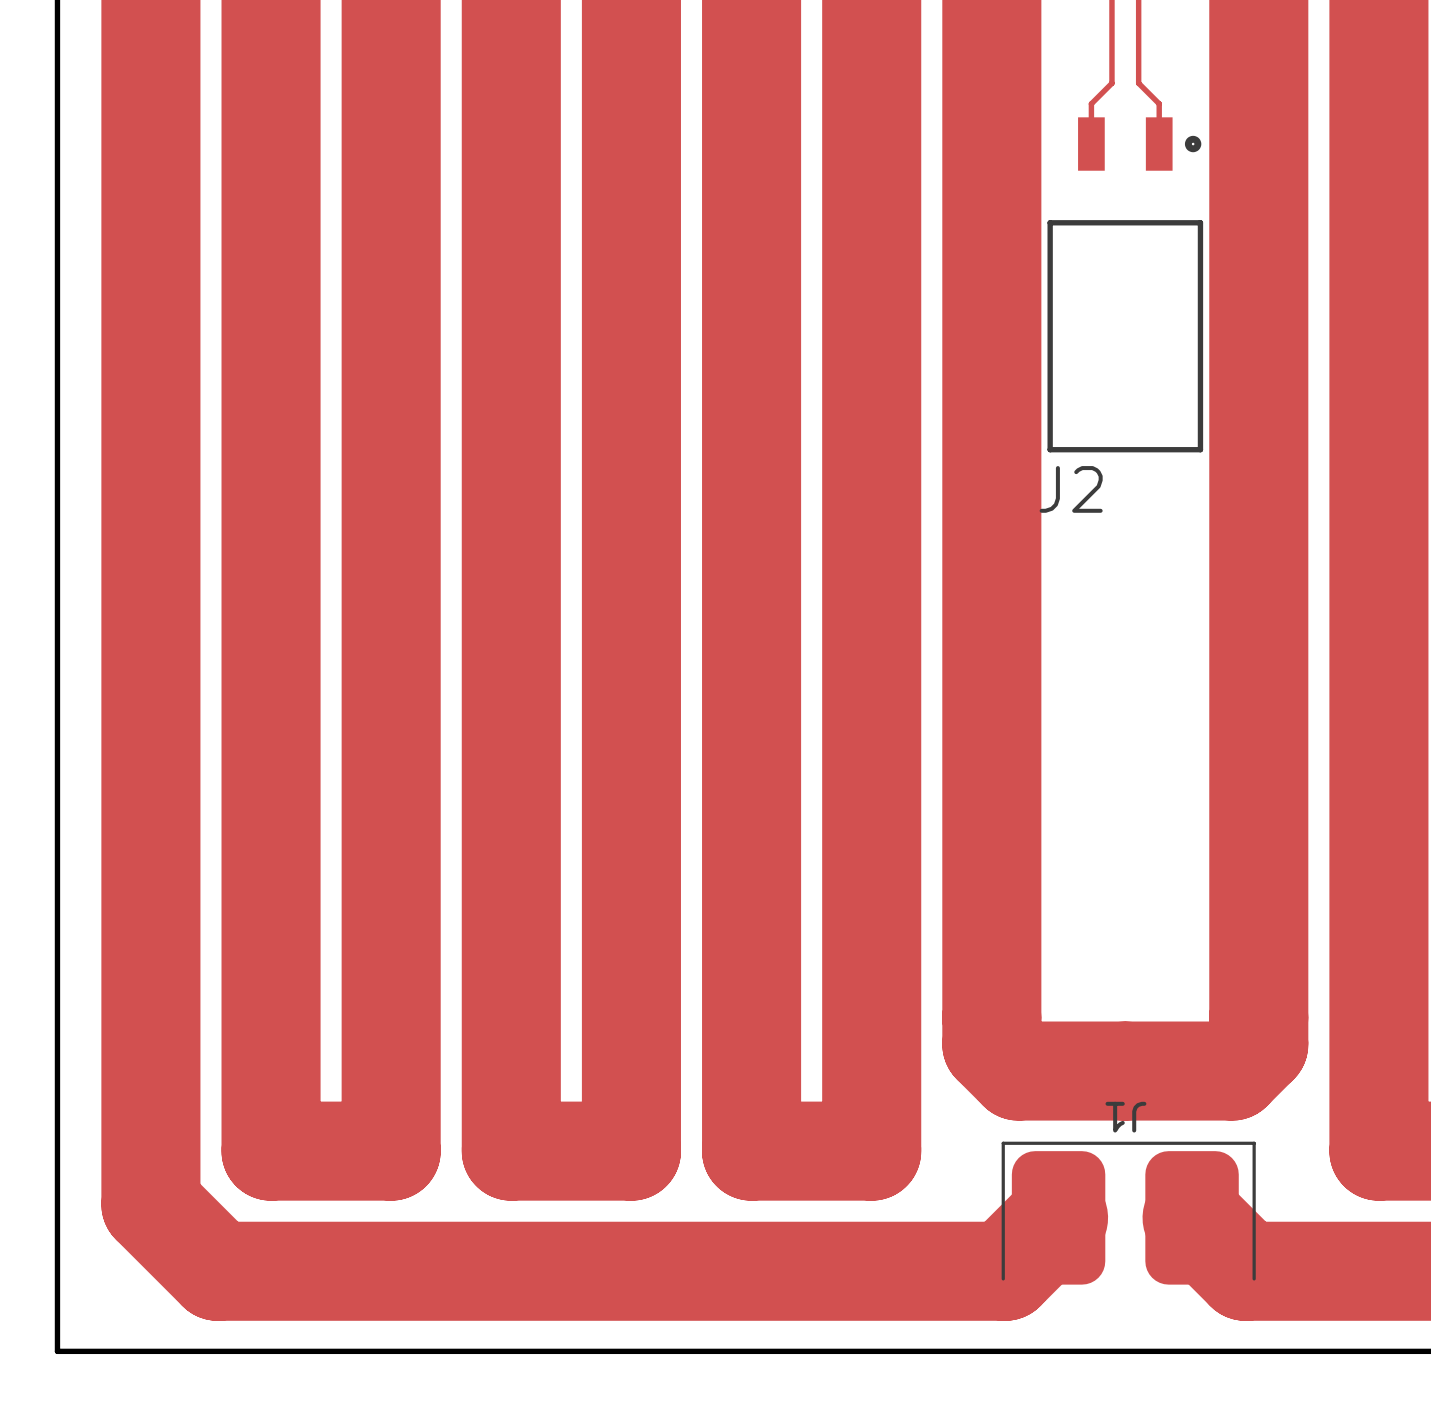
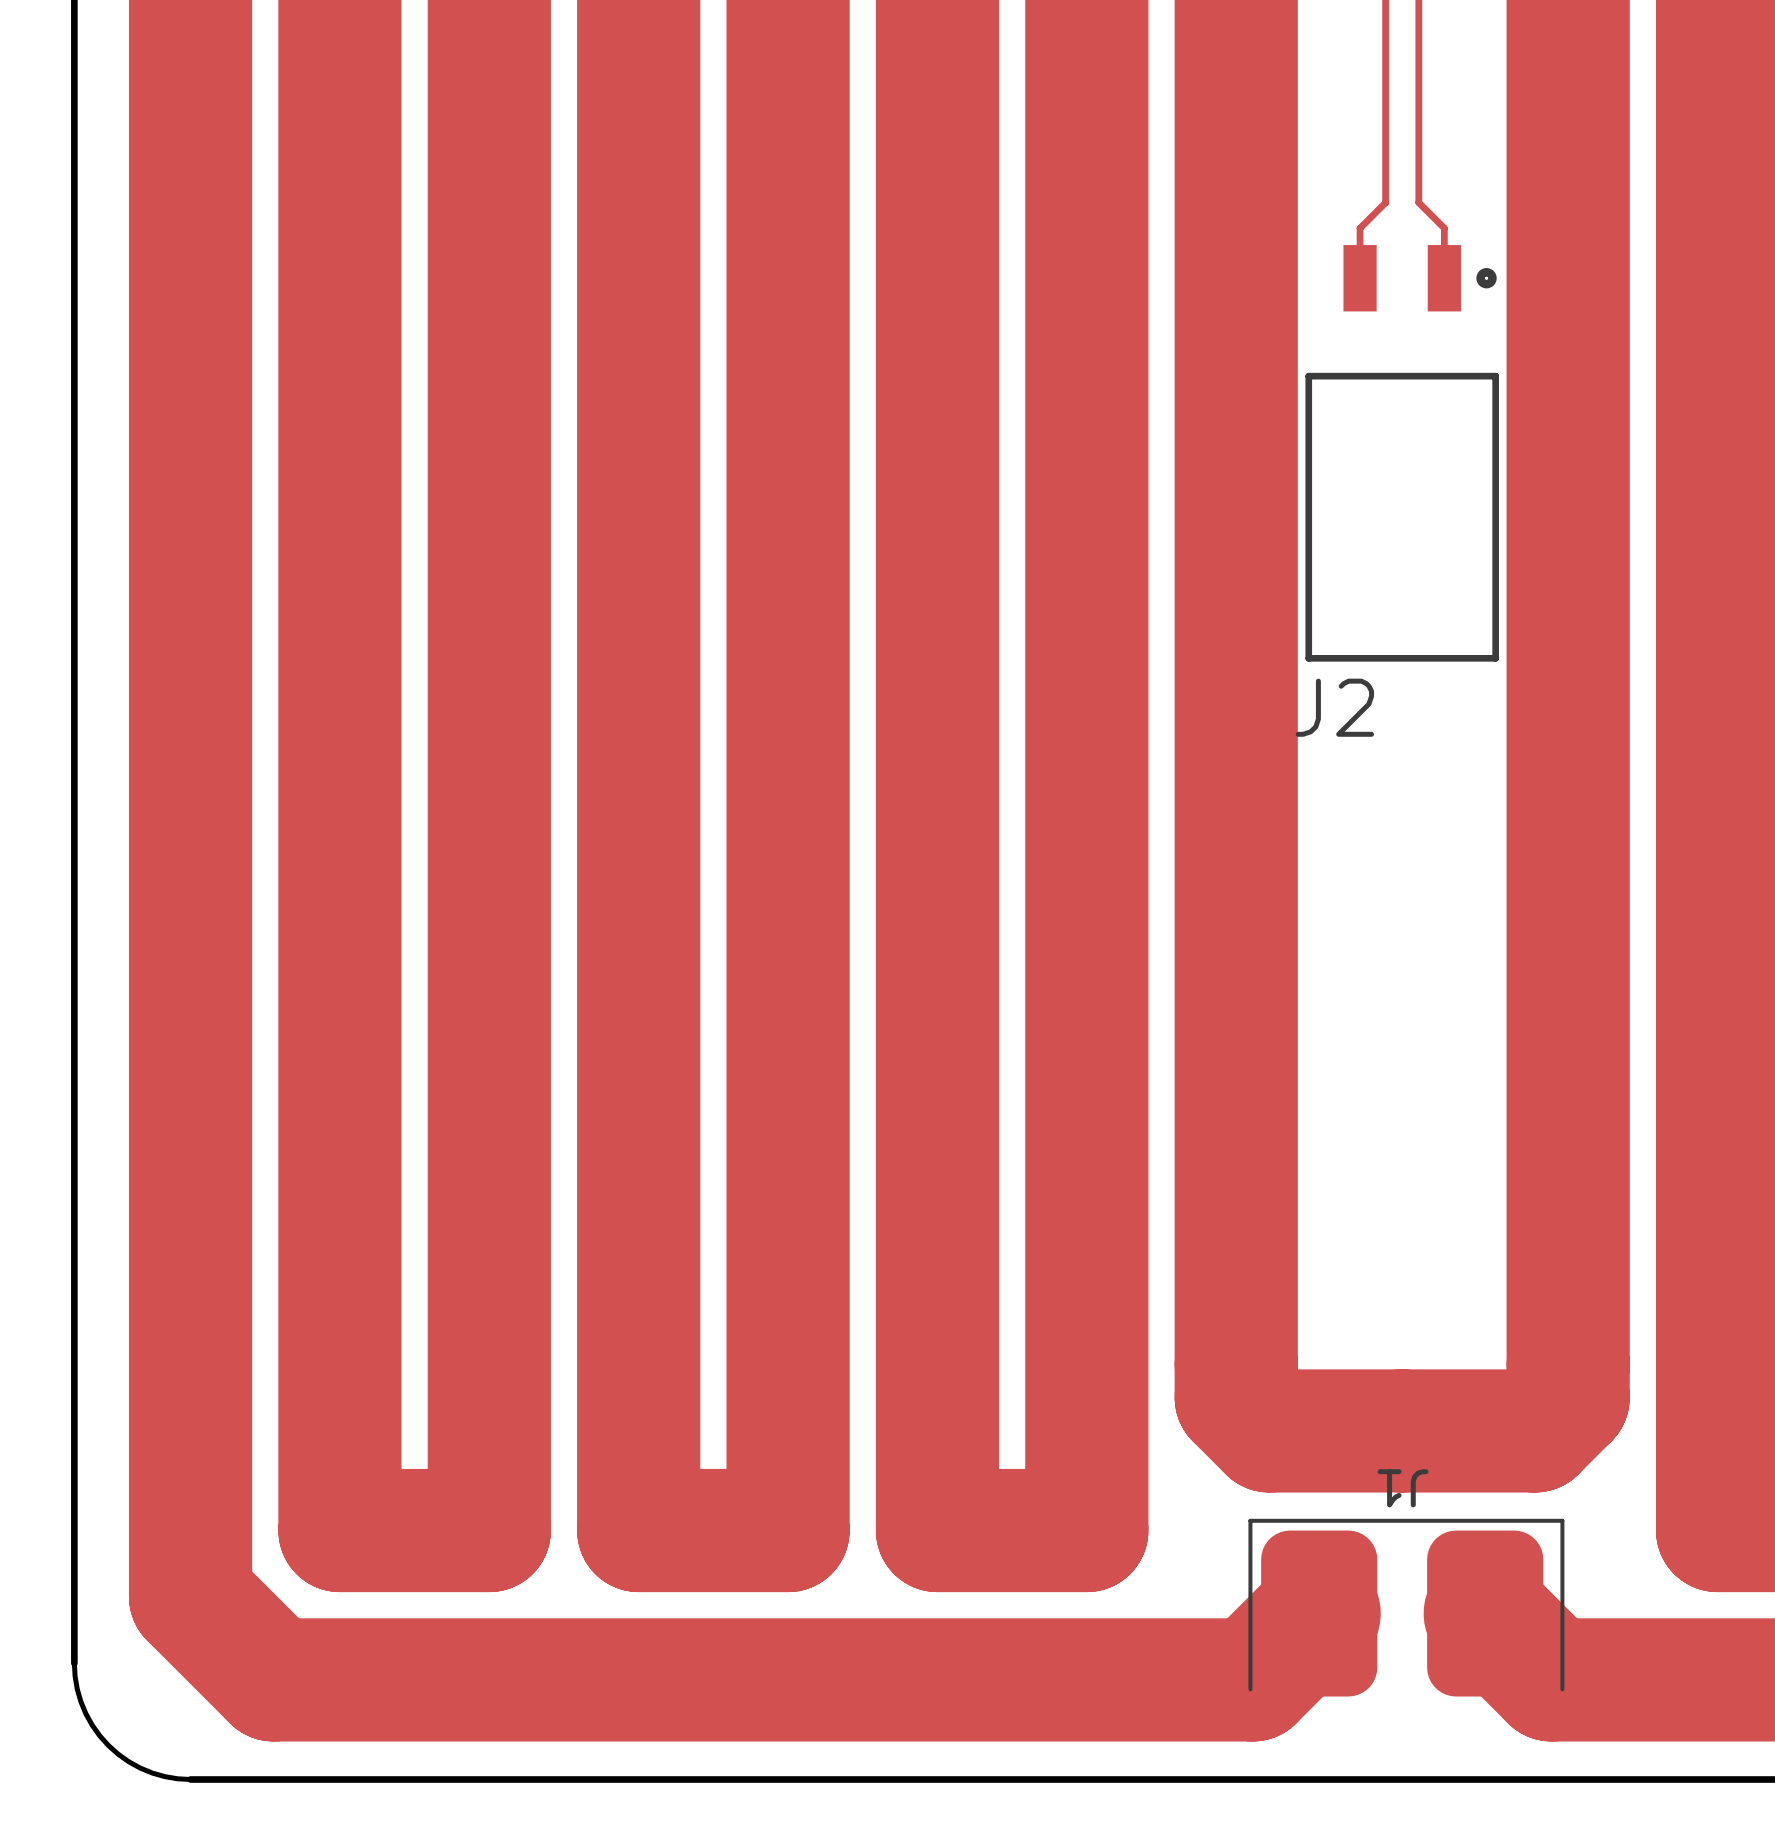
board edge: (57, 1257) (57, 1351) (150, 1351) -> (74, 1663) (77, 1689) (85, 1713) (108, 1745) (128, 1761) (152, 1772) (190, 1779)

